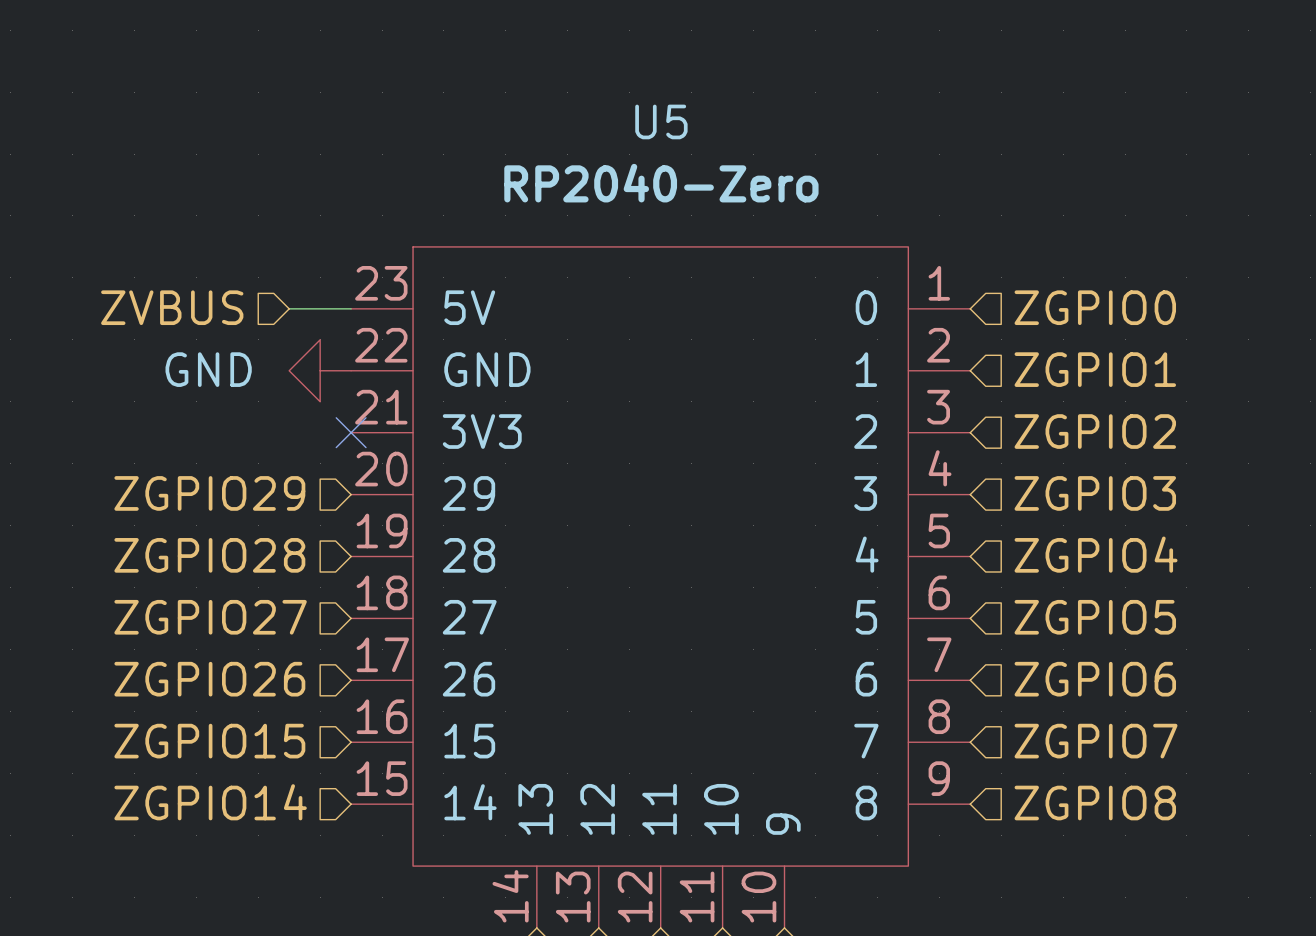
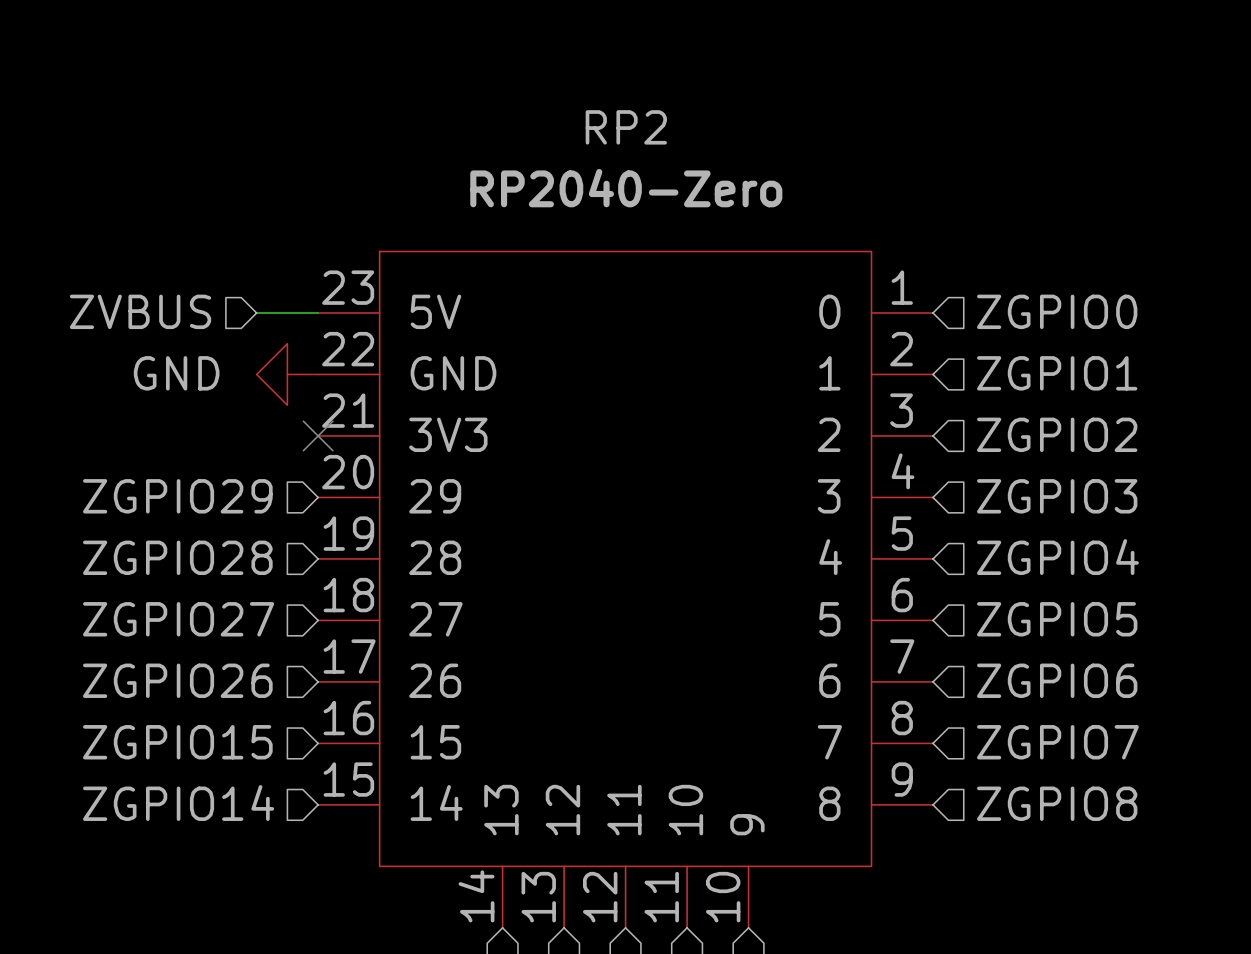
U5 name: U5 (661, 121) -> RP2 (626, 127)

